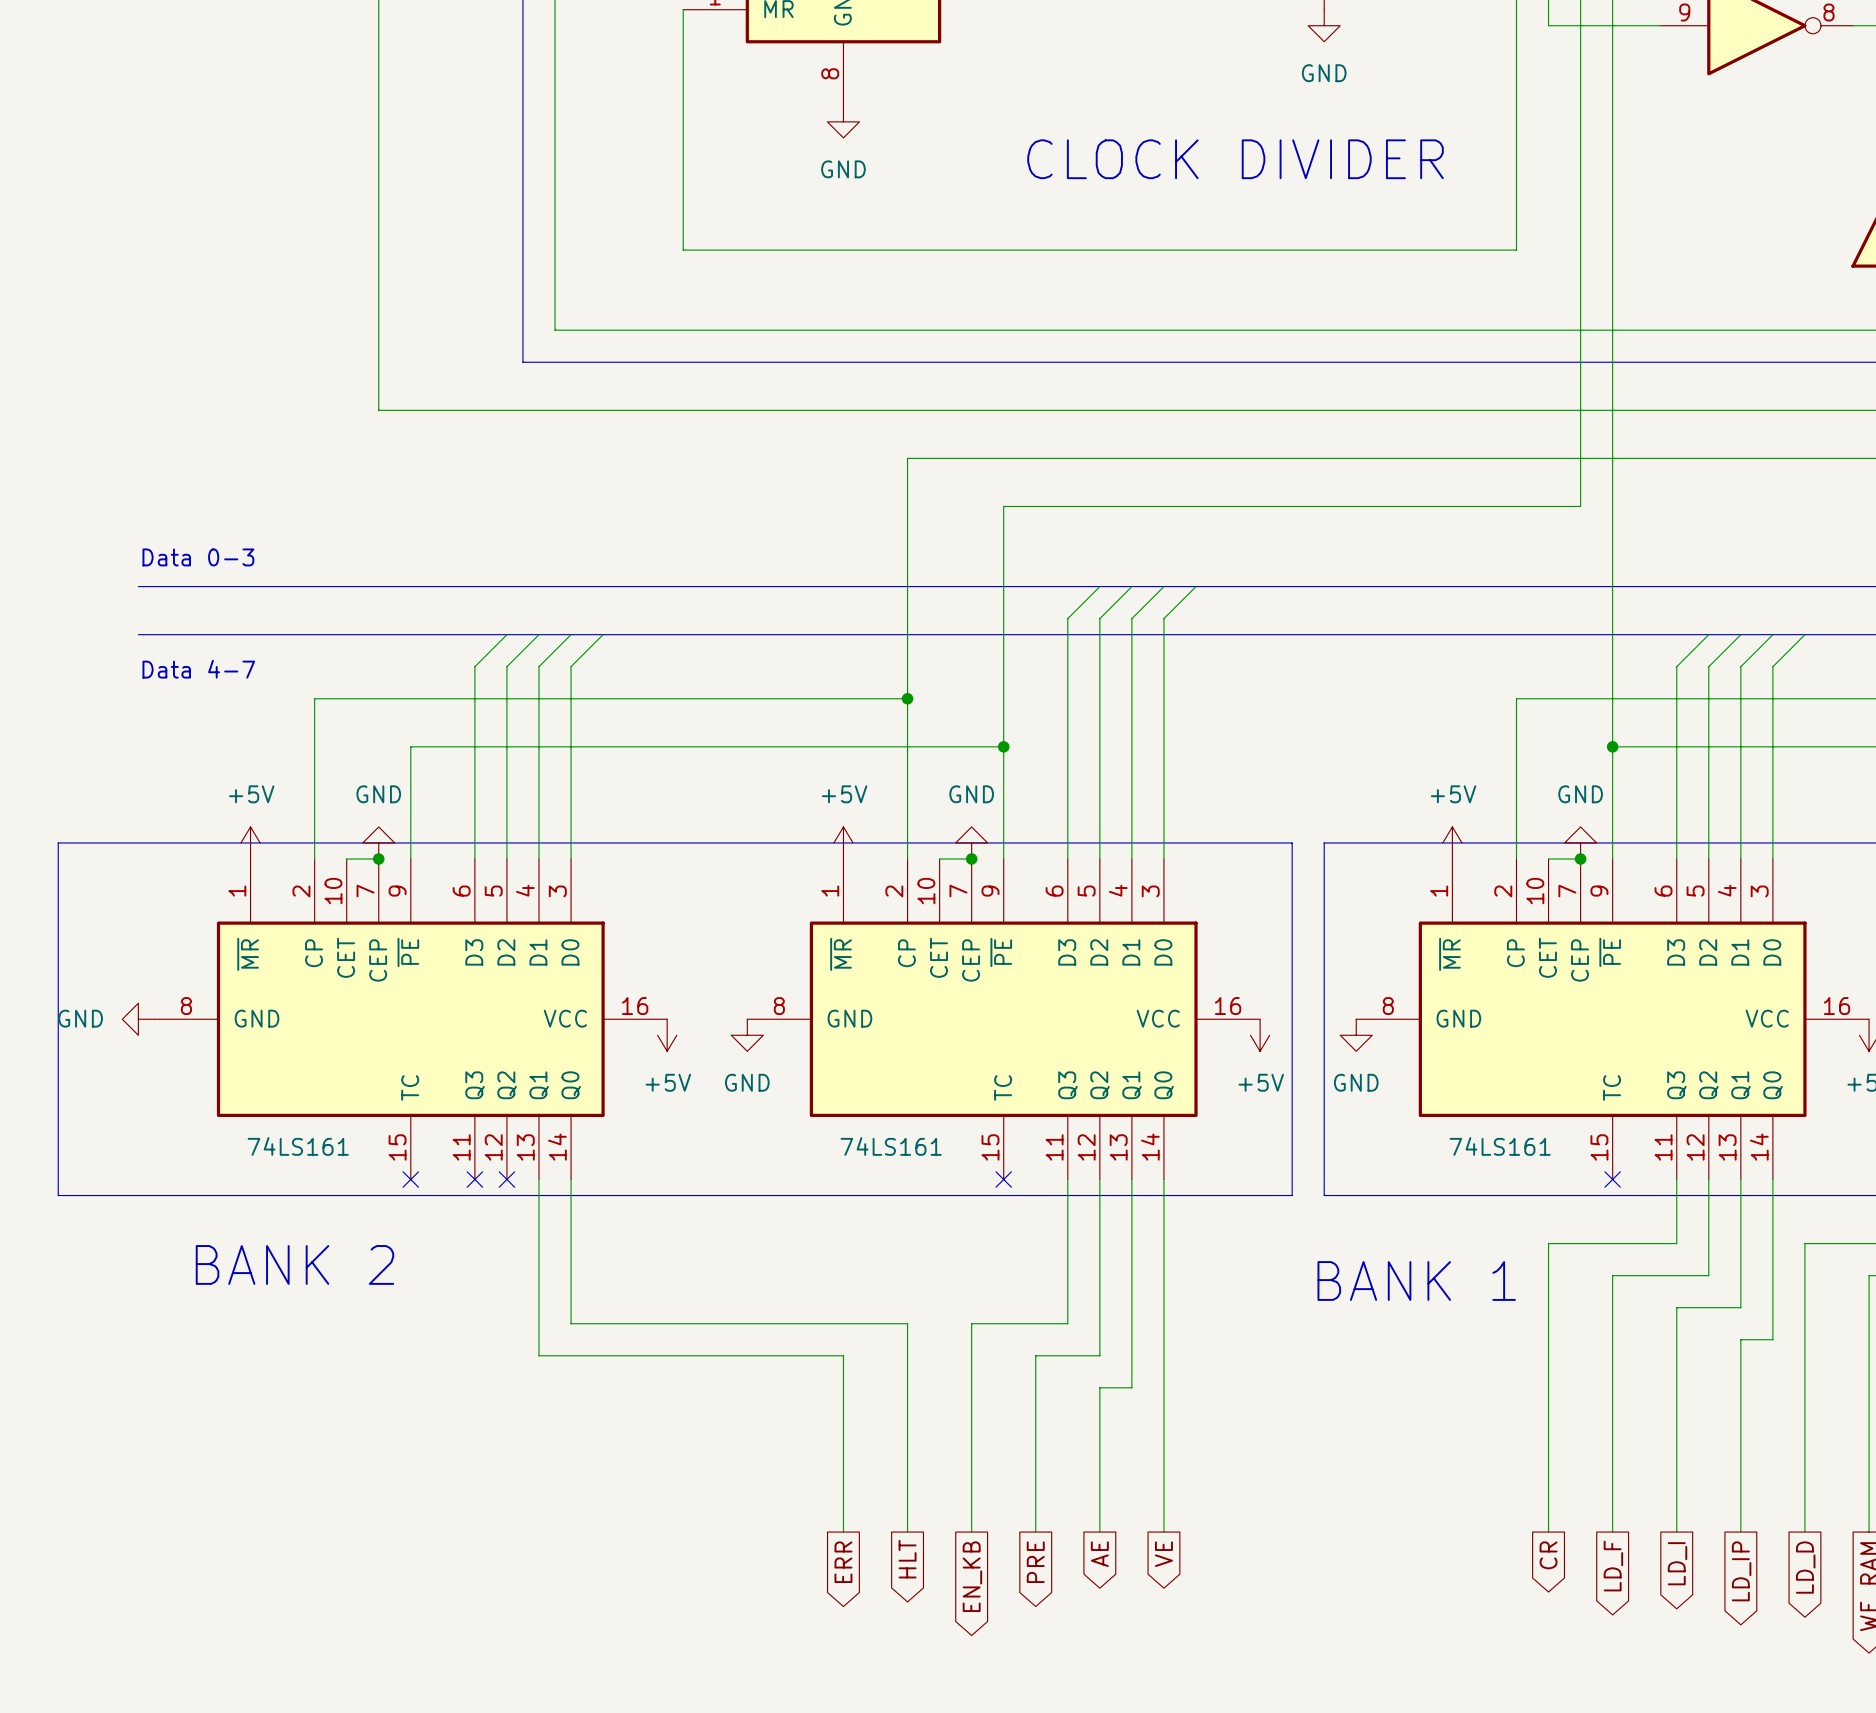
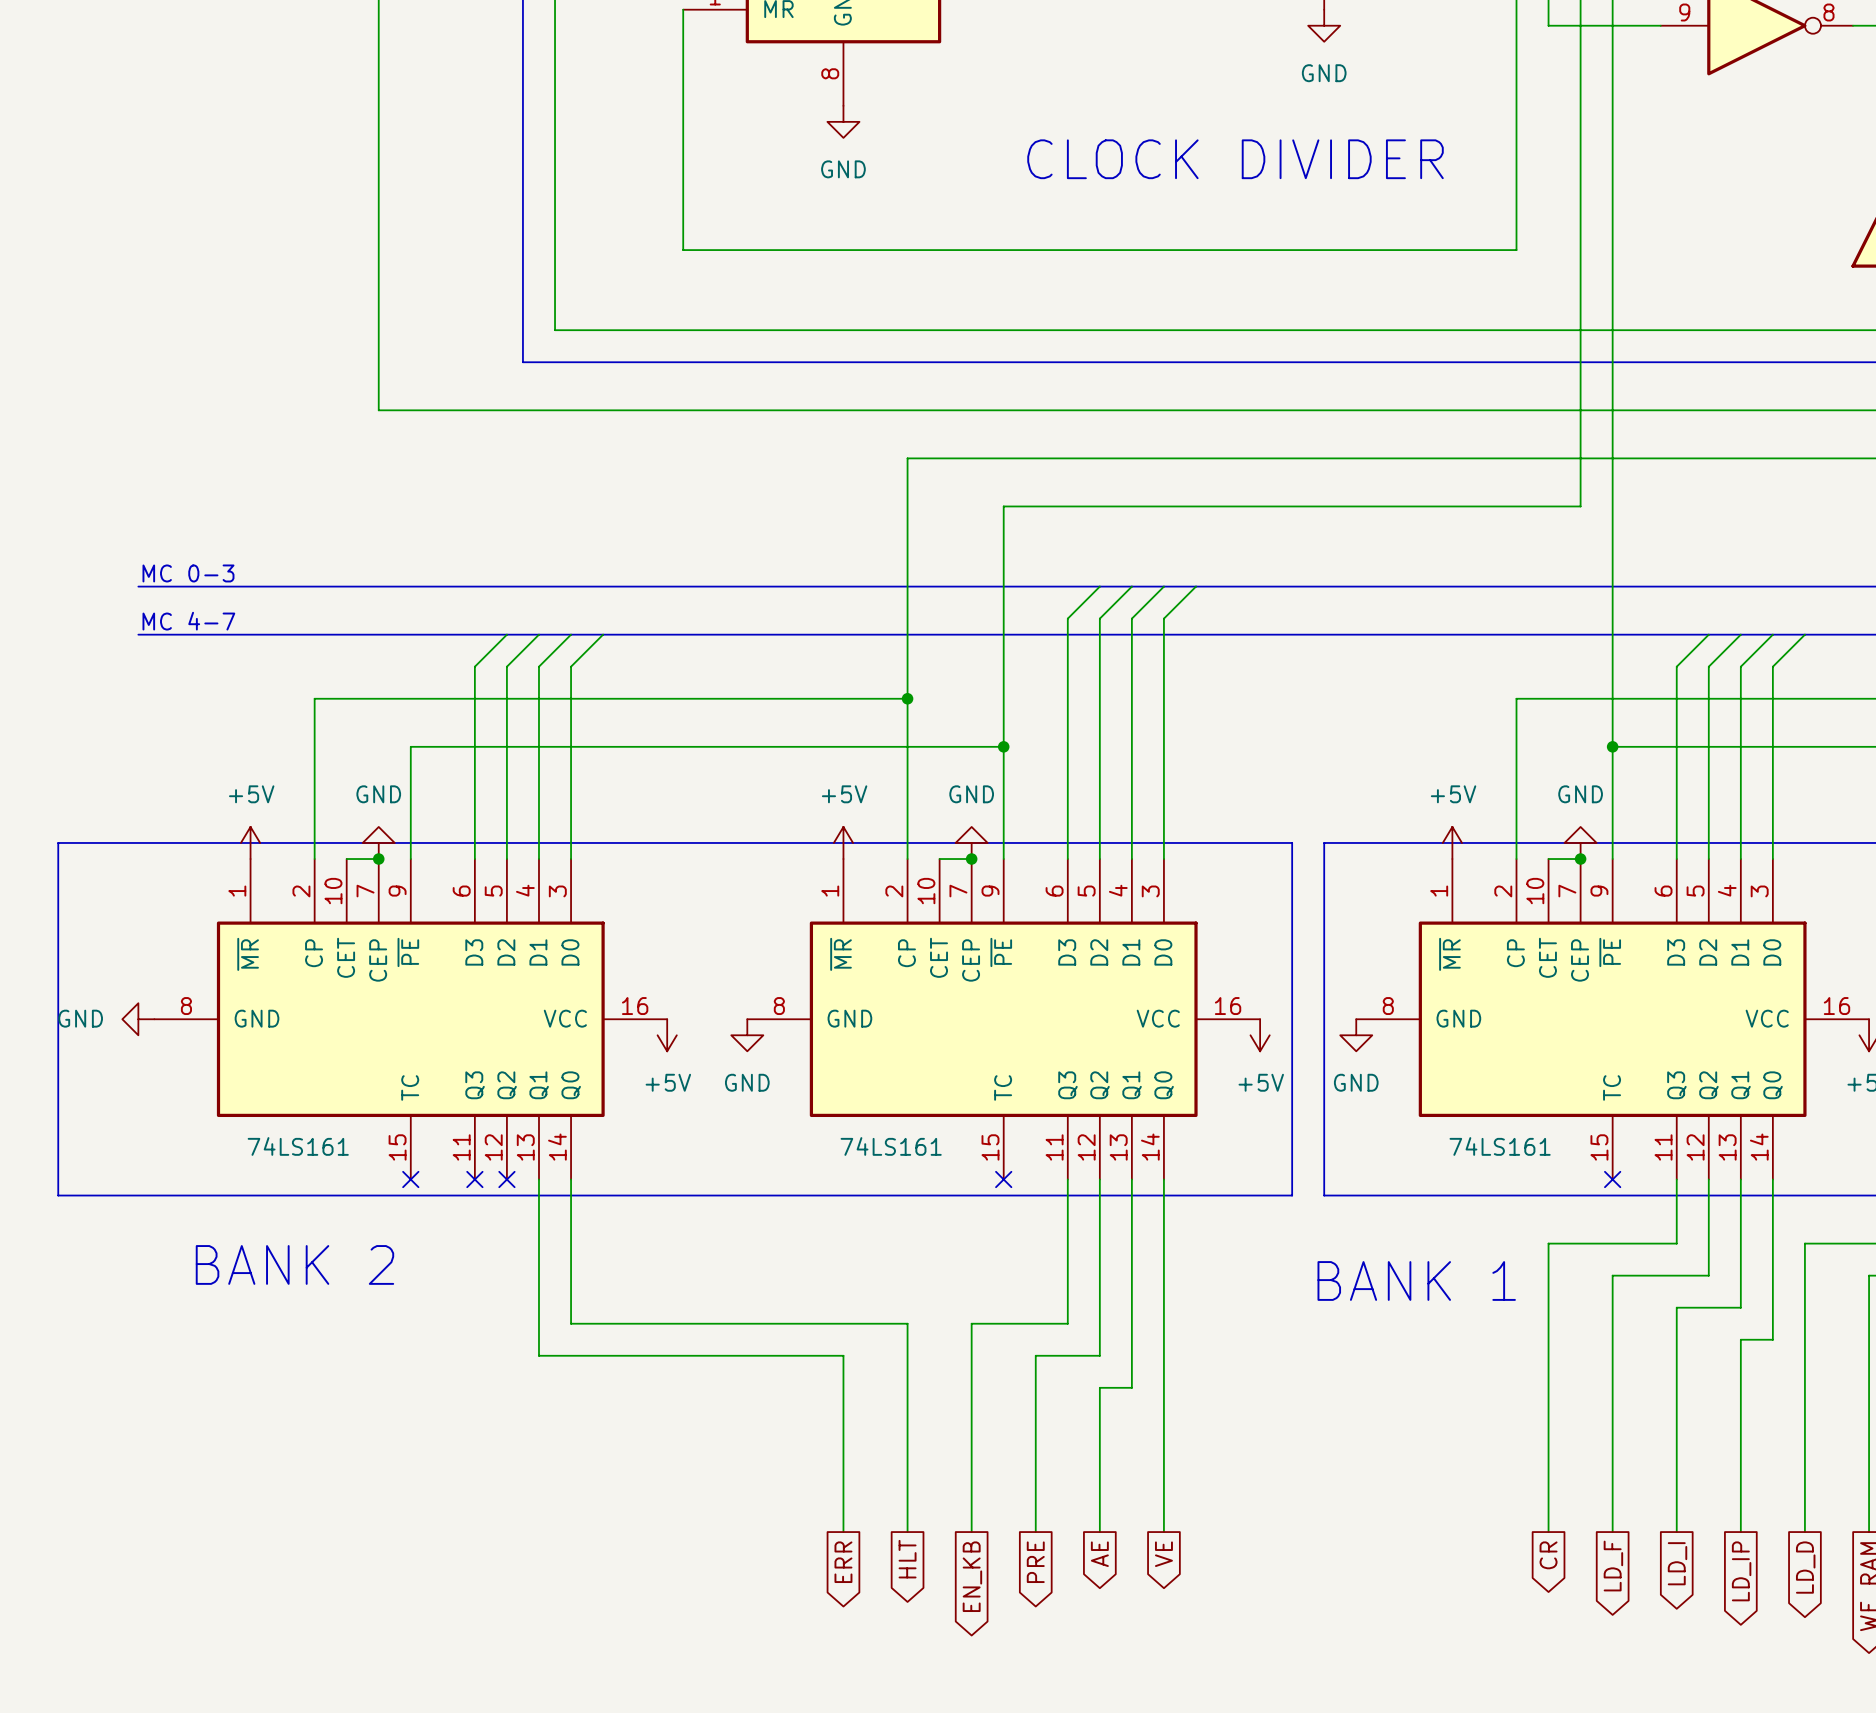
text: Data 0-3 (198, 557) -> none
text: none -> MC 0-3 (188, 573)
text: none -> MC 4-7 (188, 621)
text: Data 4-7 (198, 669) -> none

